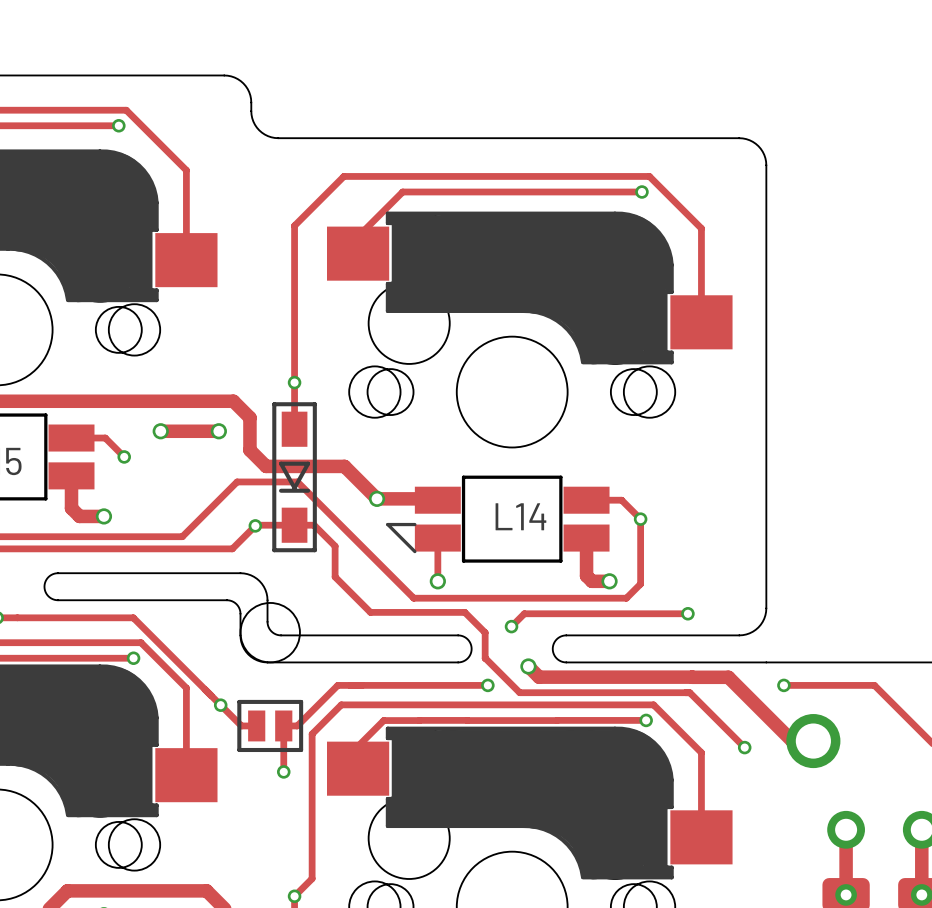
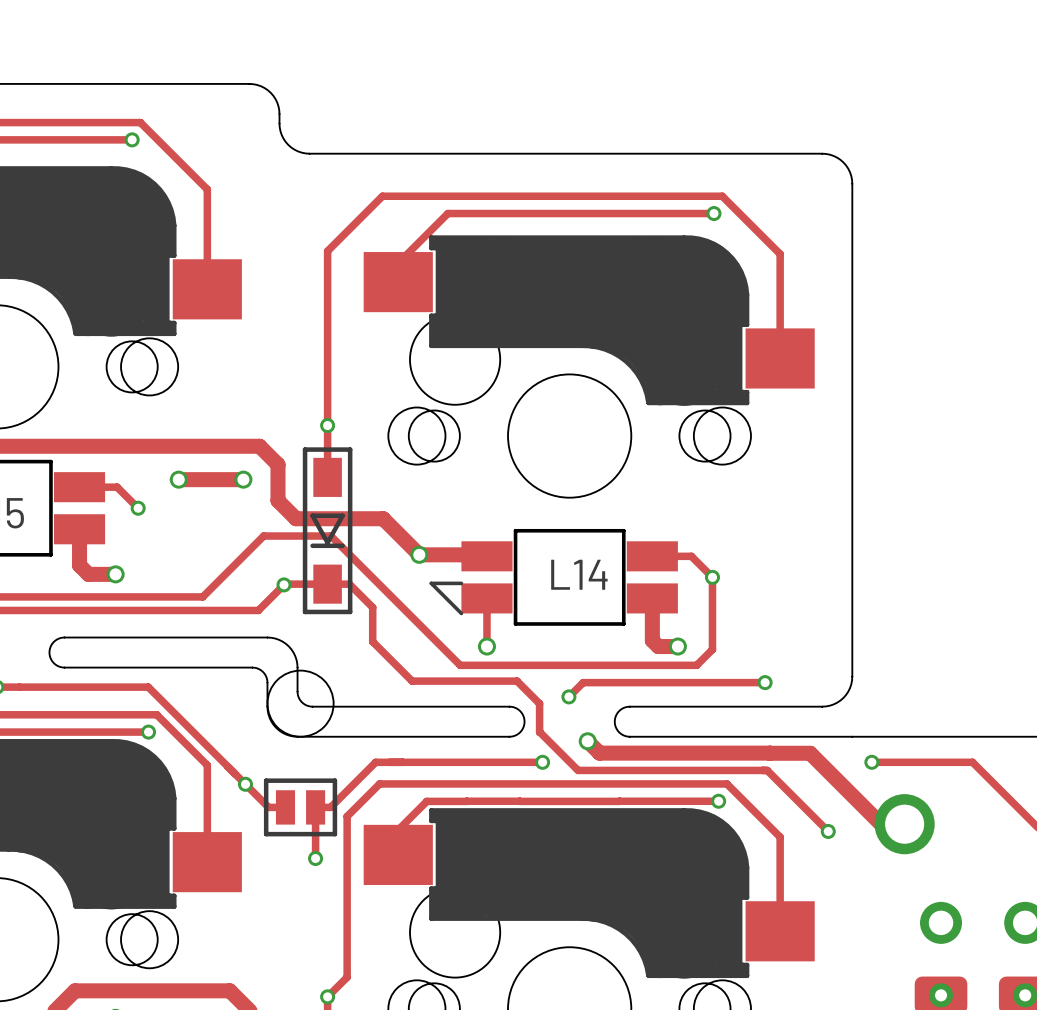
track: (846, 829) (846, 894) -> none
track: (921, 829) (921, 894) -> none

